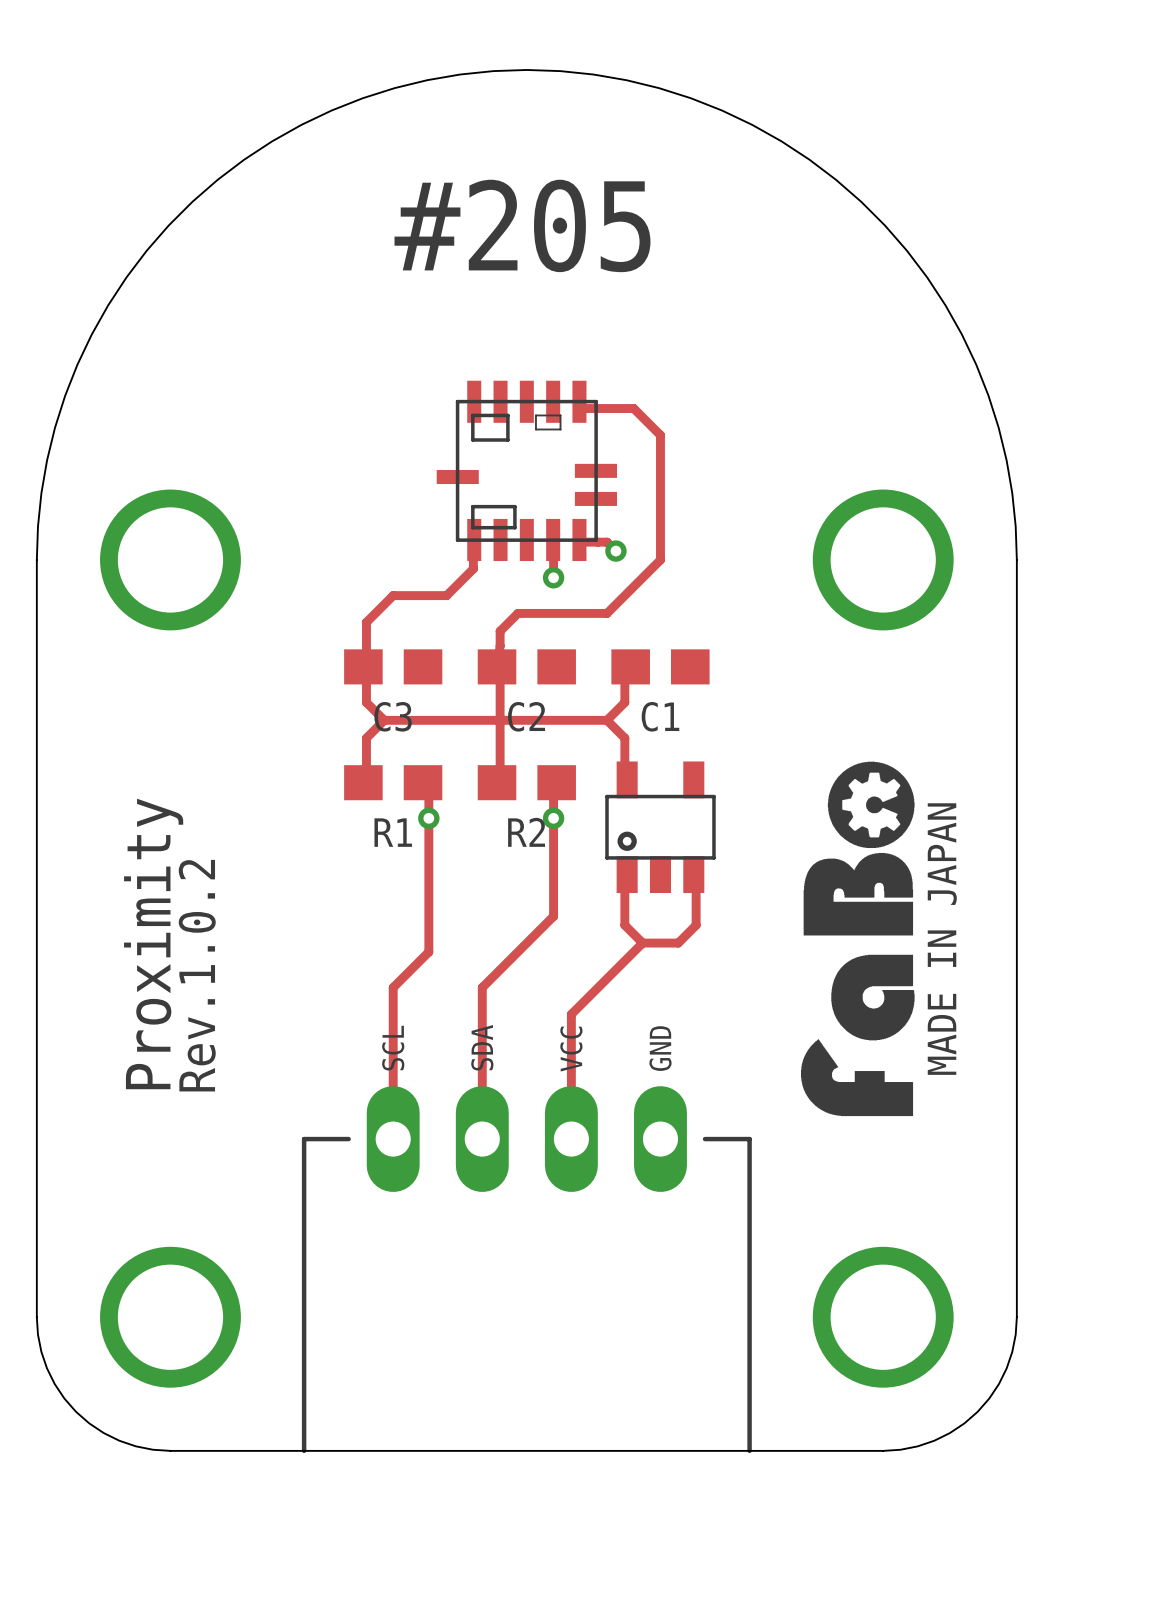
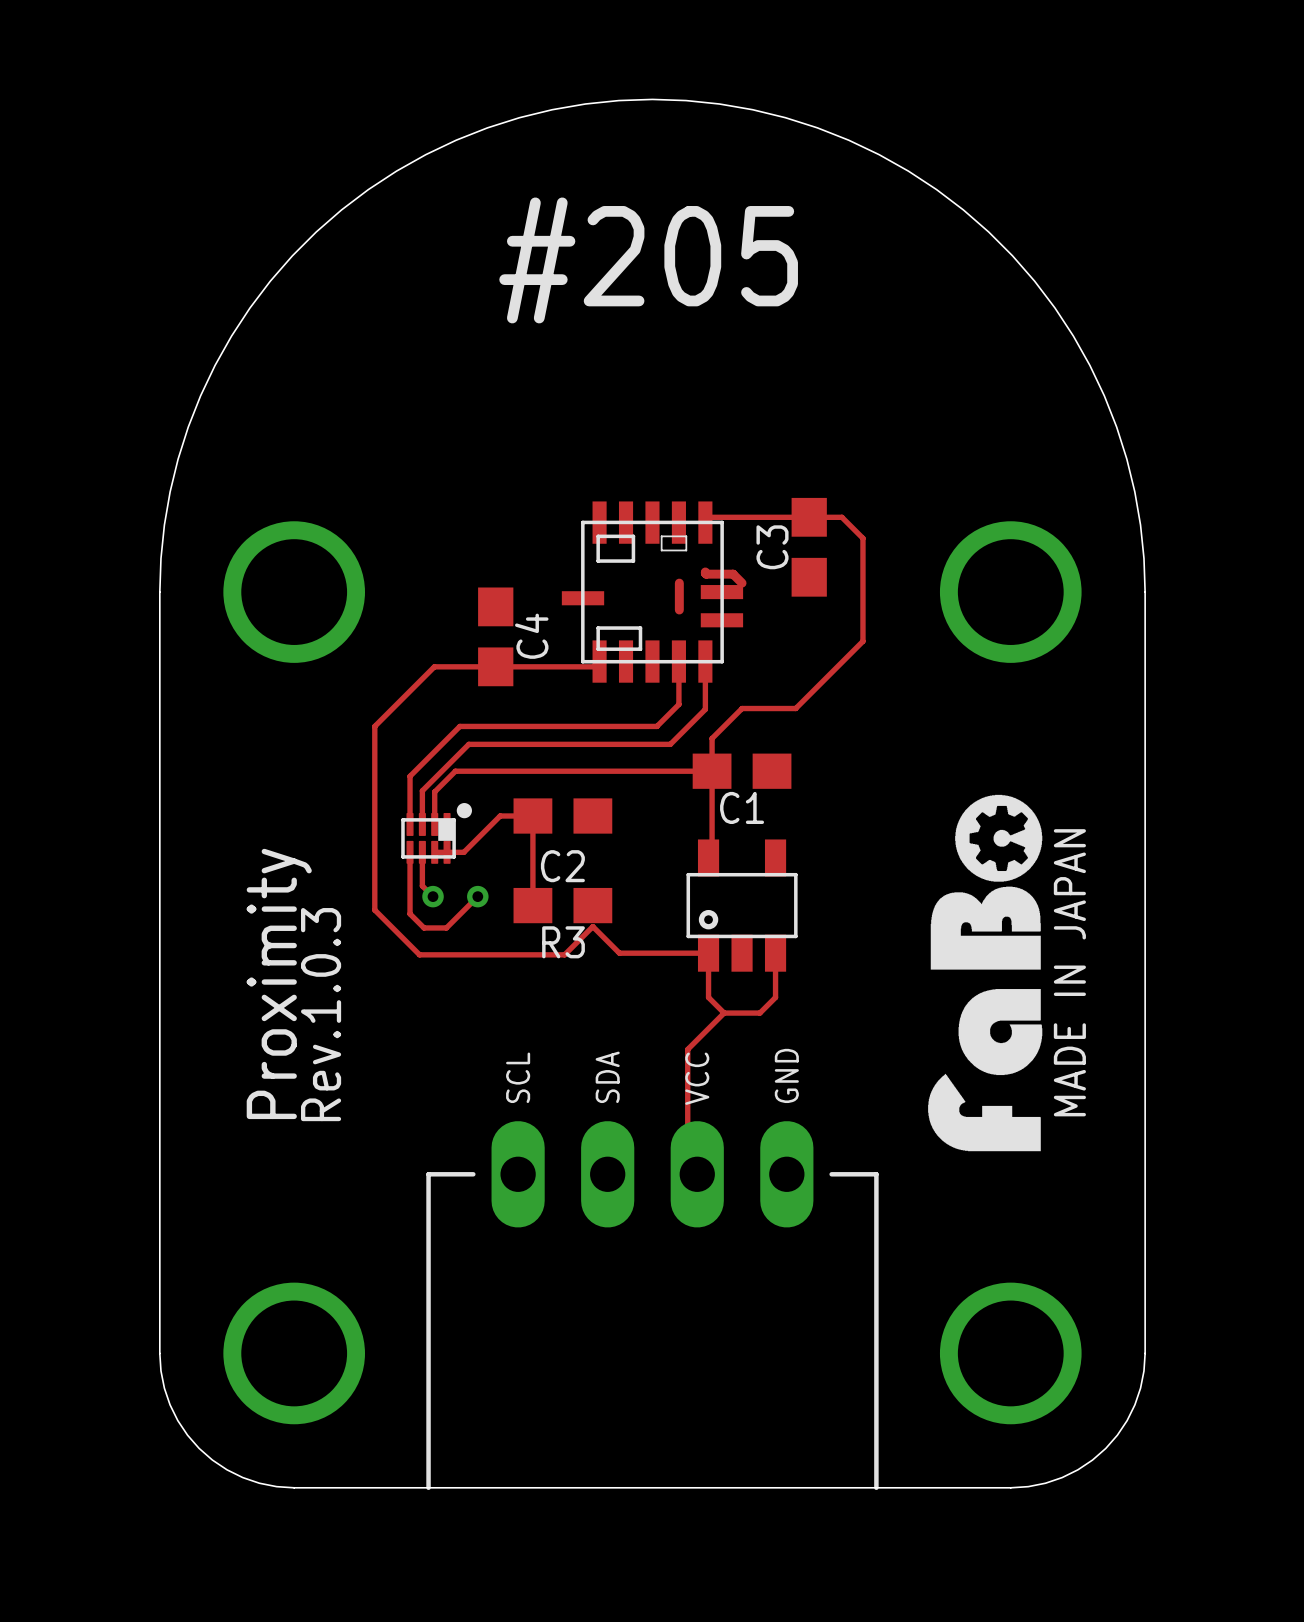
track: (579, 401) (580, 408) (633, 408) (660, 435) (660, 559) (607, 613) (517, 613) (500, 631) (497, 666) (500, 652) (500, 779) (497, 782) -> none
part position: (526, 470) -> (652, 592)
track: none -> (705, 522) (710, 517) (841, 517) (862, 538) (862, 641) (795, 708) (742, 708) (712, 738) (712, 857) (708, 857)
track: (474, 539) (473, 568) (446, 595) (393, 595) (366, 622) (366, 702) (384, 720) -> none
via: (615, 551) -> none
via: (553, 577) -> none
C4: none -> (495, 636)
track: none -> (599, 661) (594, 666) (434, 666) (374, 726) (374, 910) (419, 954) (564, 954) (592, 926) (619, 953) (708, 953) (708, 997) (724, 1013)
track: none -> (678, 661) (678, 704) (656, 726) (459, 726) (410, 776) (410, 824)
track: none -> (705, 661) (705, 709) (670, 744) (468, 744) (422, 790) (422, 824)
C3 rotation: 0° (393, 666) -> 90° clockwise (809, 547)
C3 position: (393, 666) -> (809, 547)
C2 position: (526, 666) -> (562, 816)
track: (630, 666) (621, 661) (624, 657) (624, 702) (607, 720) -> none
C1 position: (660, 666) -> (742, 771)
C1 name position: C1 (660, 716) -> C1 (742, 807)
track: (384, 720) (607, 720) -> none
track: (384, 720) (366, 738) (366, 779) (363, 782) -> none
track: (607, 720) (624, 738) (624, 777) (627, 779) -> none
track: none -> (712, 771) (455, 771) (434, 791) (434, 824)
R1: (393, 782) -> none
track: (423, 782) (428, 788) (428, 951) (393, 987) (393, 1139) -> none
R2: (526, 782) -> none
track: (556, 782) (553, 785) (553, 916) (482, 987) (482, 1139) -> none
part: none -> (436, 833)
track: none -> (410, 852) (410, 913) (424, 927) (446, 927) (477, 896)
track: none -> (422, 852) (422, 885) (433, 896)
track: none -> (434, 852) (463, 852) (500, 816) (532, 816) (532, 905)
via: (428, 818) -> none
via: (553, 818) -> none
part position: (660, 827) -> (742, 905)
via: none -> (433, 896)
via: none -> (477, 896)
R3: none -> (562, 905)
track: (627, 874) (624, 876) (624, 925) (642, 943) -> none
track: (693, 874) (693, 887) (696, 889) (696, 925) (678, 943) (642, 943) -> none
track: none -> (775, 953) (775, 997) (759, 1013) (724, 1013)
track: (642, 943) (571, 1014) (571, 1139) -> none
text: Rev.1.0.2 (197, 975) -> Rev.1.0.3 (321, 1014)
track: none -> (724, 1013) (687, 1049) (687, 1196)

